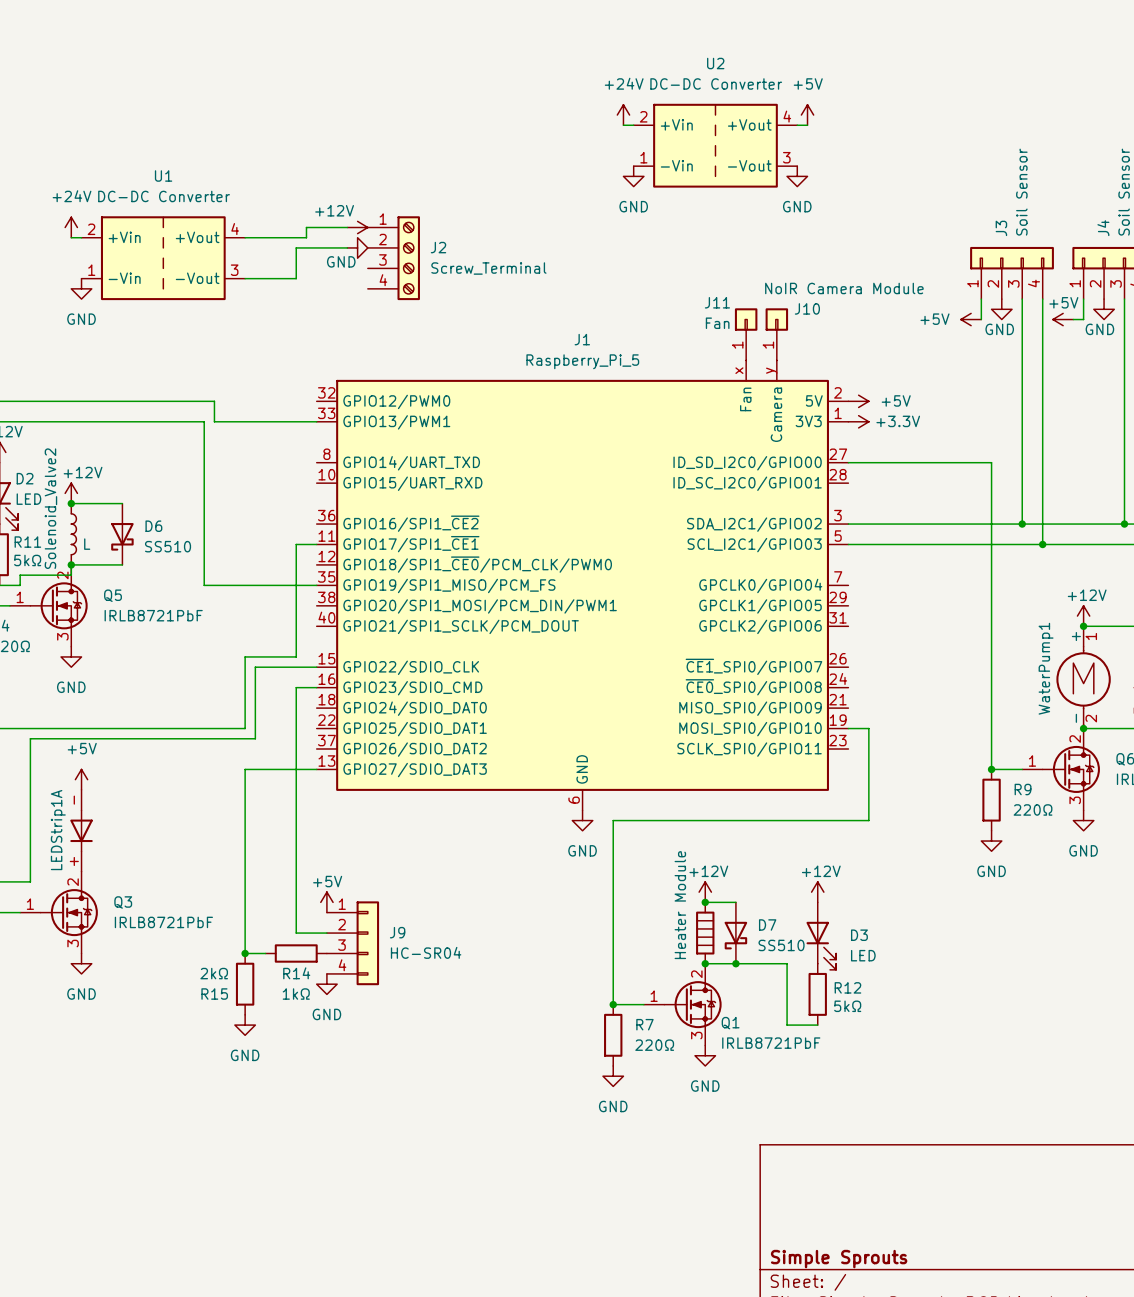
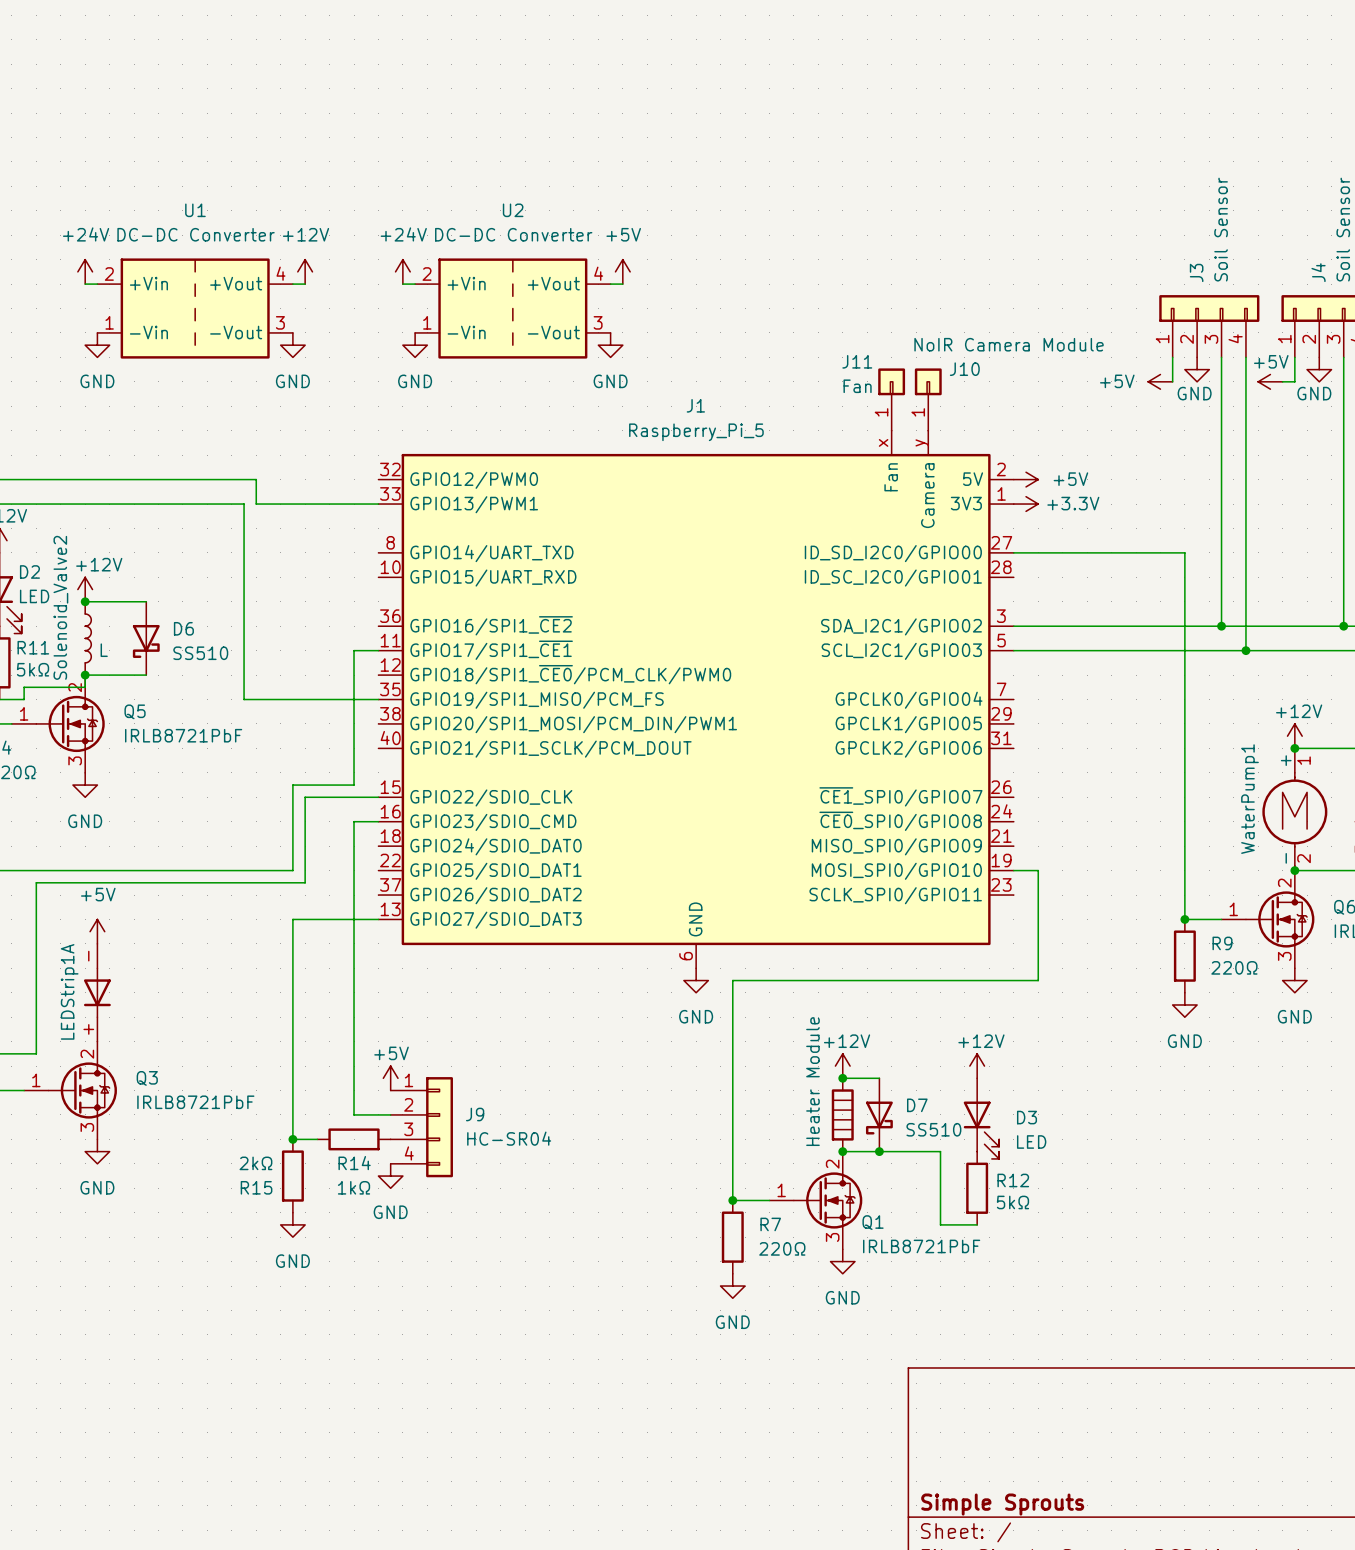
power symbol: +24V (623, 115) -> none
power symbol: +5V (807, 115) -> none
wire: (623, 125) (633, 125) -> (610, 284) (622, 284)
wire: (797, 125) (807, 125) -> none
U2 position: (715, 145) -> (512, 308)
power symbol: GND (633, 176) -> none
power symbol: GND (797, 176) -> none
power symbol text position: +12V (334, 210) -> +12V (306, 234)
power symbol: none -> +24V (402, 271)
wire: (347, 227) (306, 227) (306, 237) (255, 237) -> none
power symbol rotation: 0° (357, 227) -> 90° counterclockwise (305, 271)
power symbol position: +12V (357, 227) -> +12V (305, 271)
power symbol: none -> +5V (622, 271)
wire: none -> (402, 284) (415, 284)
wire: (347, 247) (296, 247) (296, 278) (245, 278) -> none
power symbol rotation: 0° (357, 247) -> 90° clockwise (415, 345)
power symbol position: GND (357, 247) -> GND (415, 345)
J2: Screw_Terminal (393, 258) -> none
power symbol text position: GND (341, 261) -> GND (415, 381)
power symbol: none -> GND (292, 345)
power symbol: none -> GND (610, 345)

